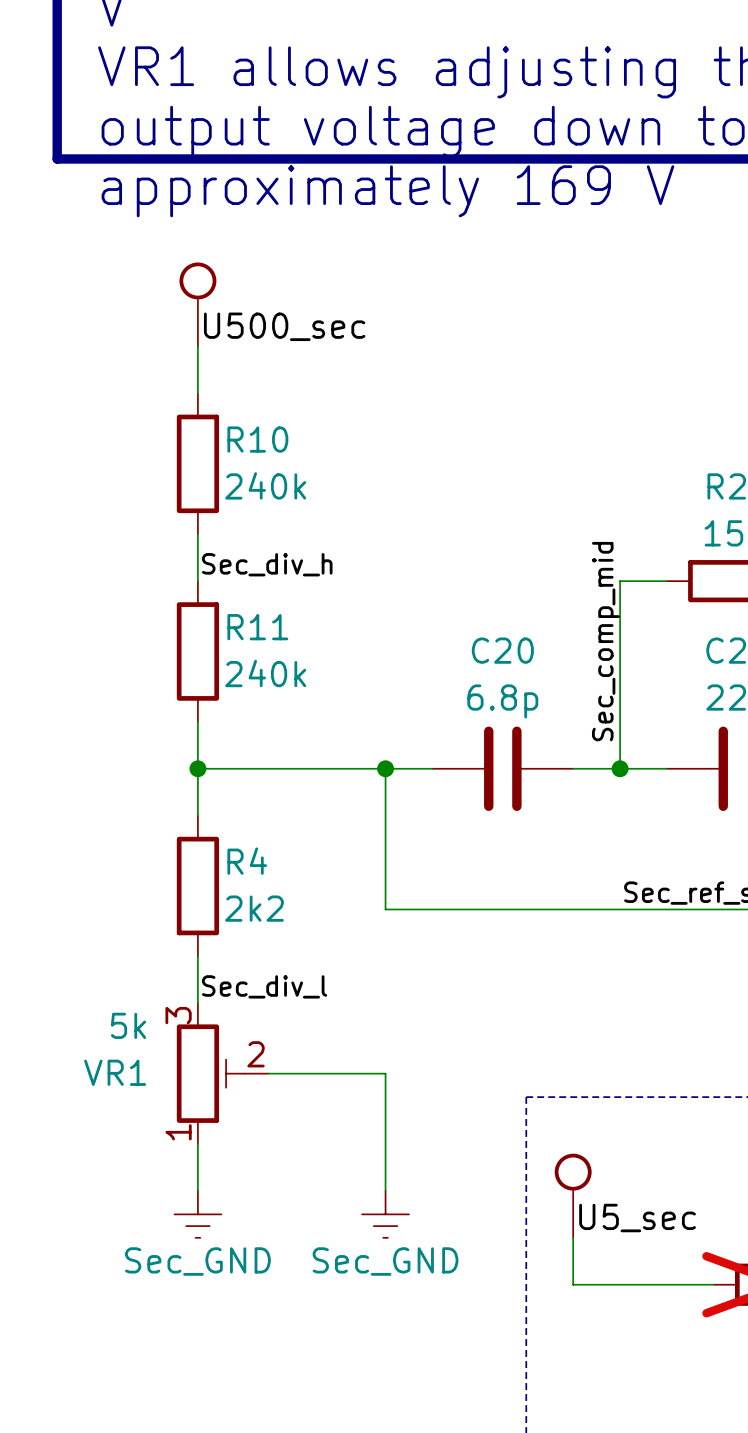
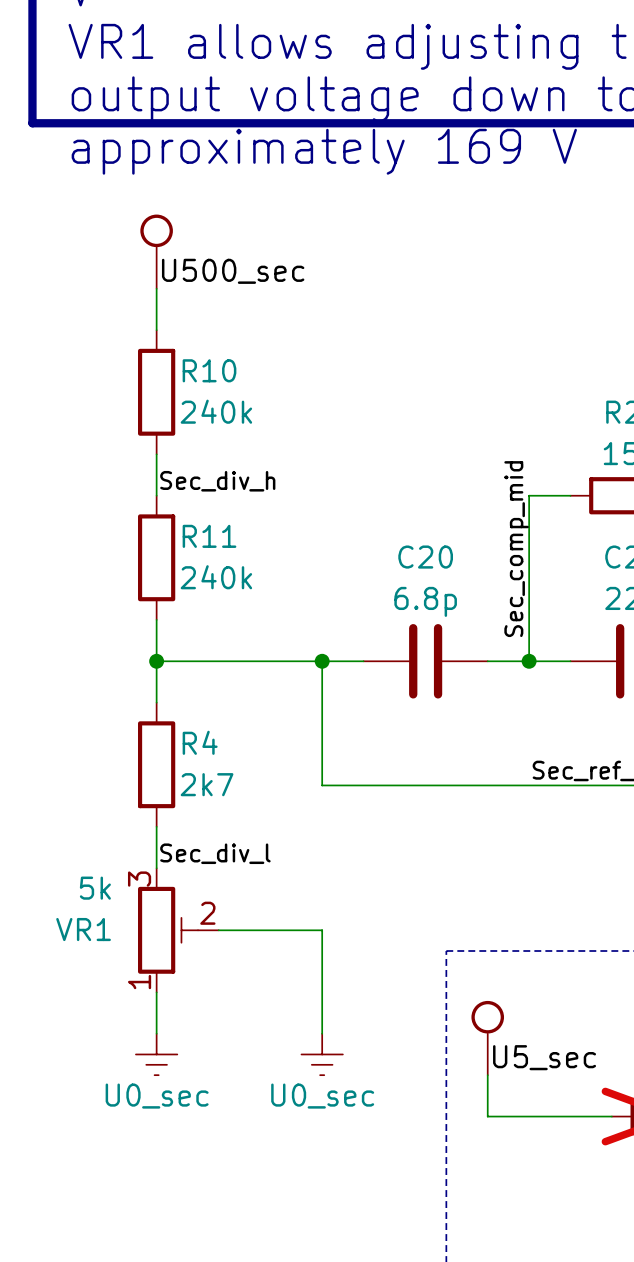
R4 value: 2k2 (254, 908) -> 2k7 (207, 784)
power symbol: Sec_GND (197, 1214) -> U0_sec (156, 1054)
power symbol: Sec_GND (385, 1214) -> U0_sec (322, 1054)

